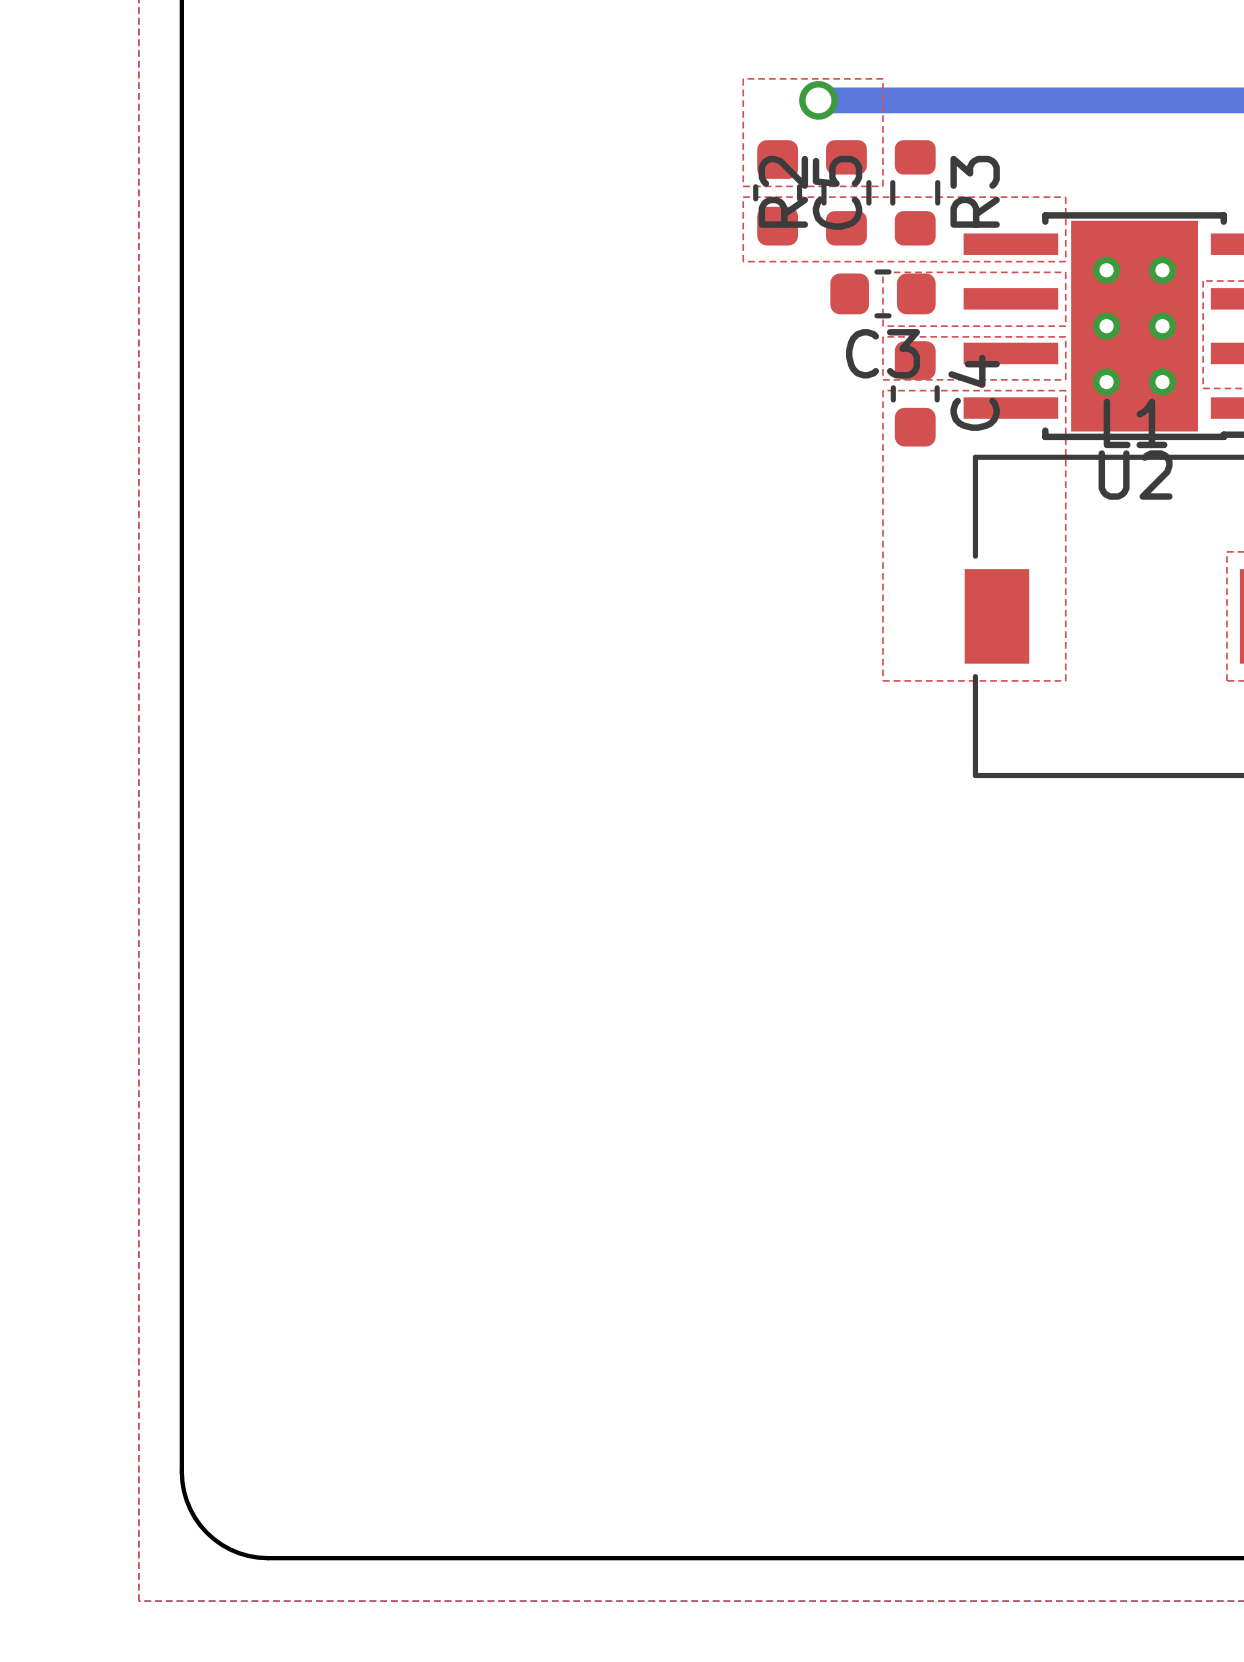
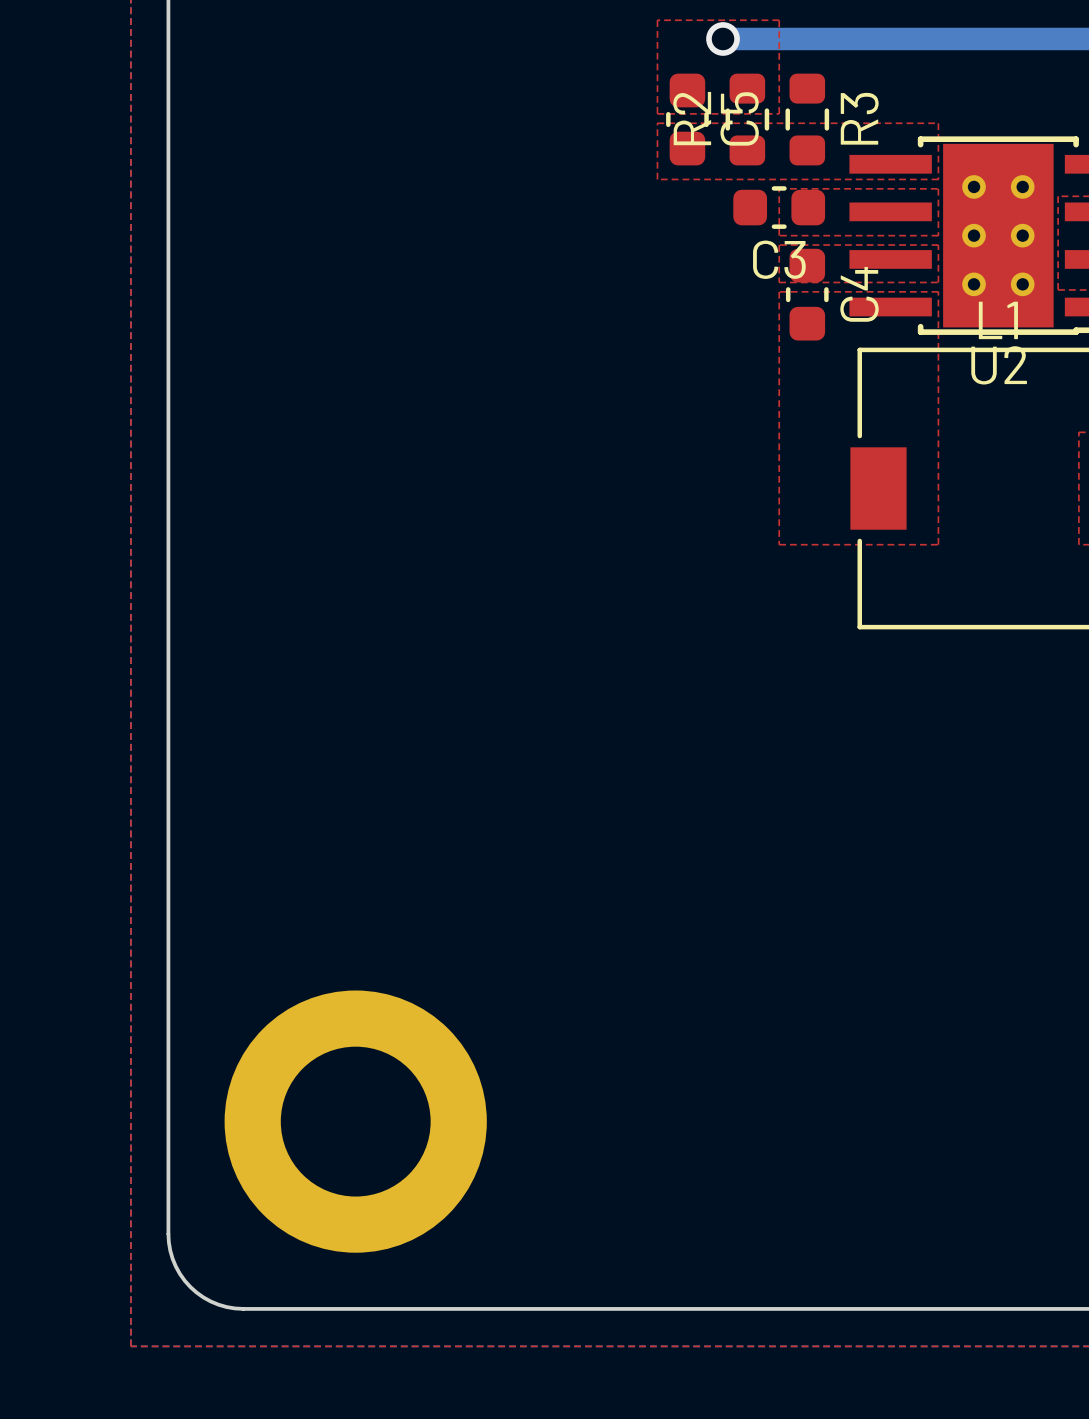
part: none -> (355, 1121)

